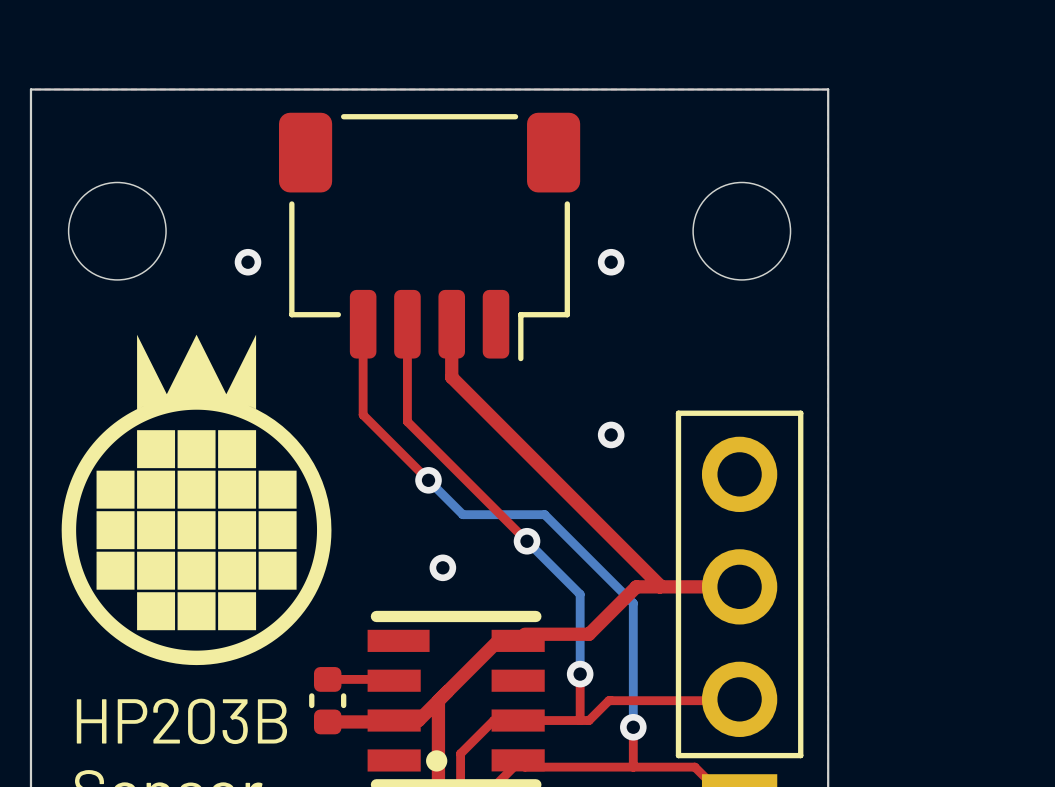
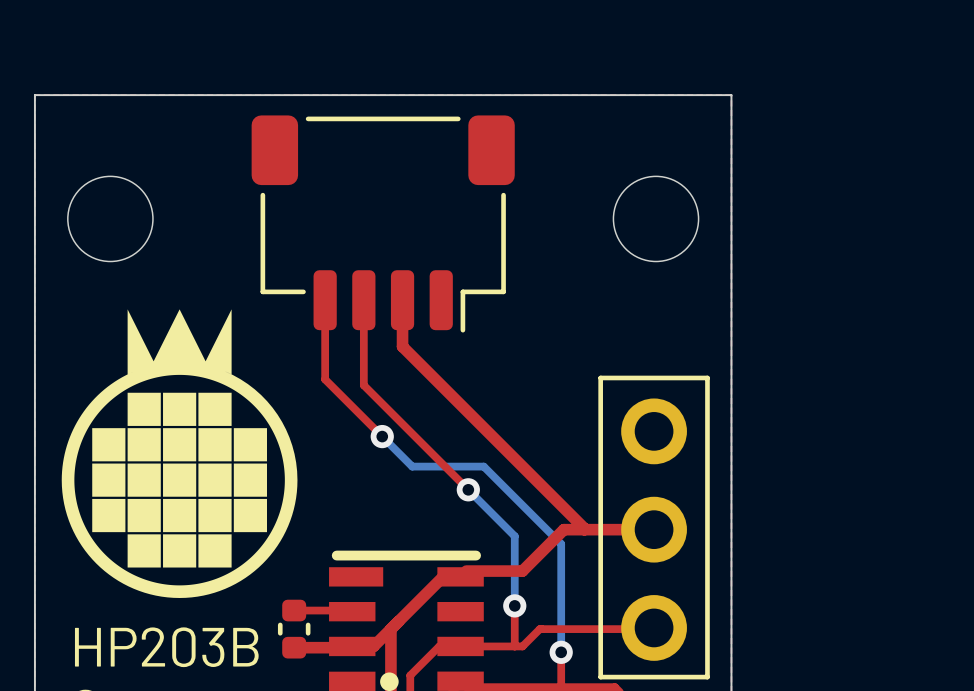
via: (248, 262) -> none
via: (611, 262) -> none
via: (611, 434) -> none
via: (442, 567) -> none

